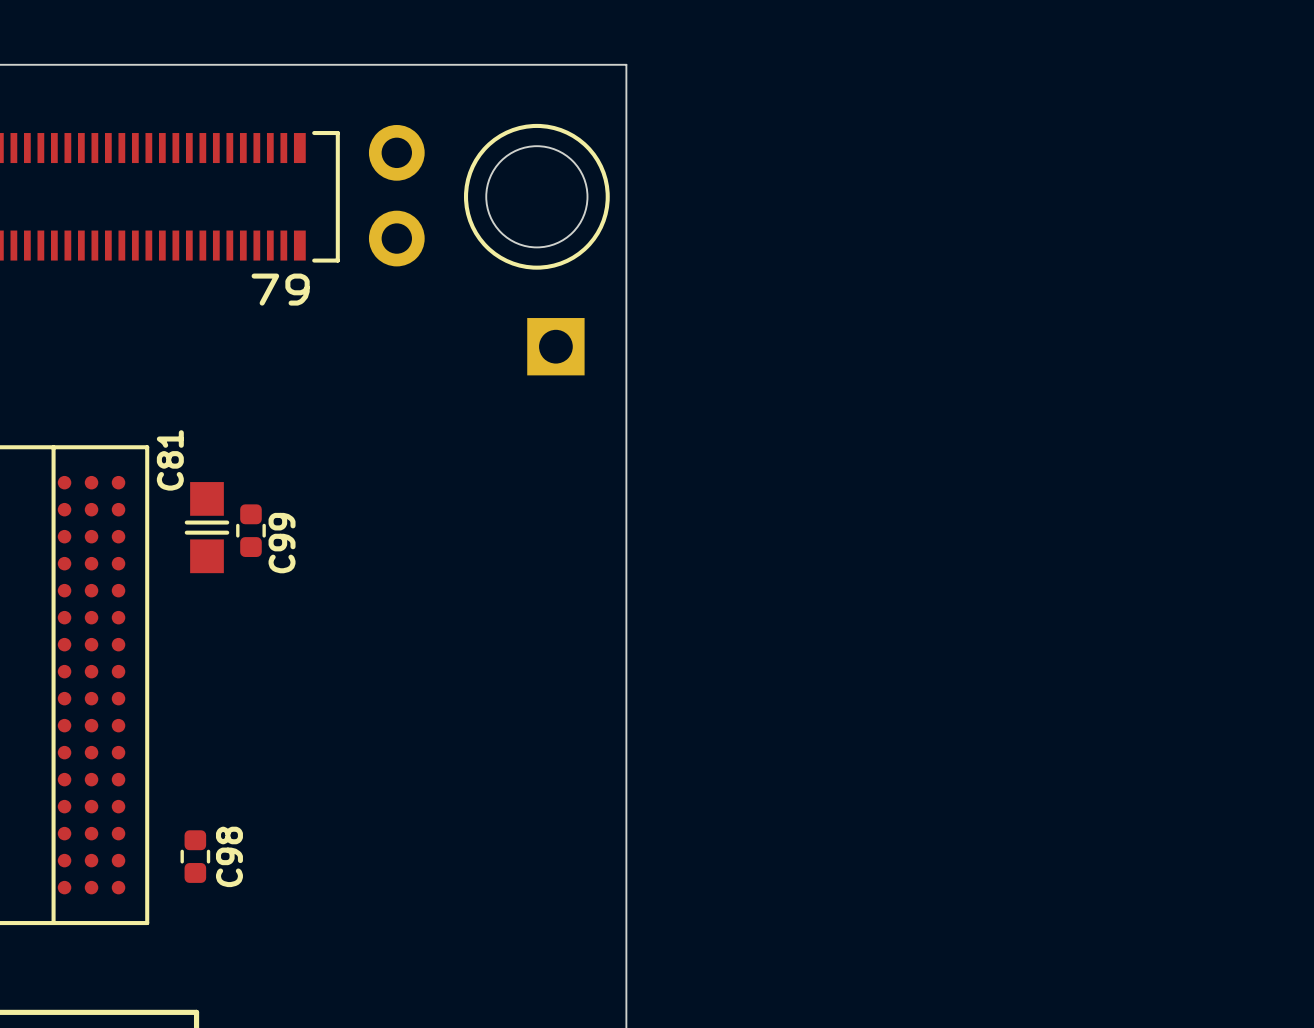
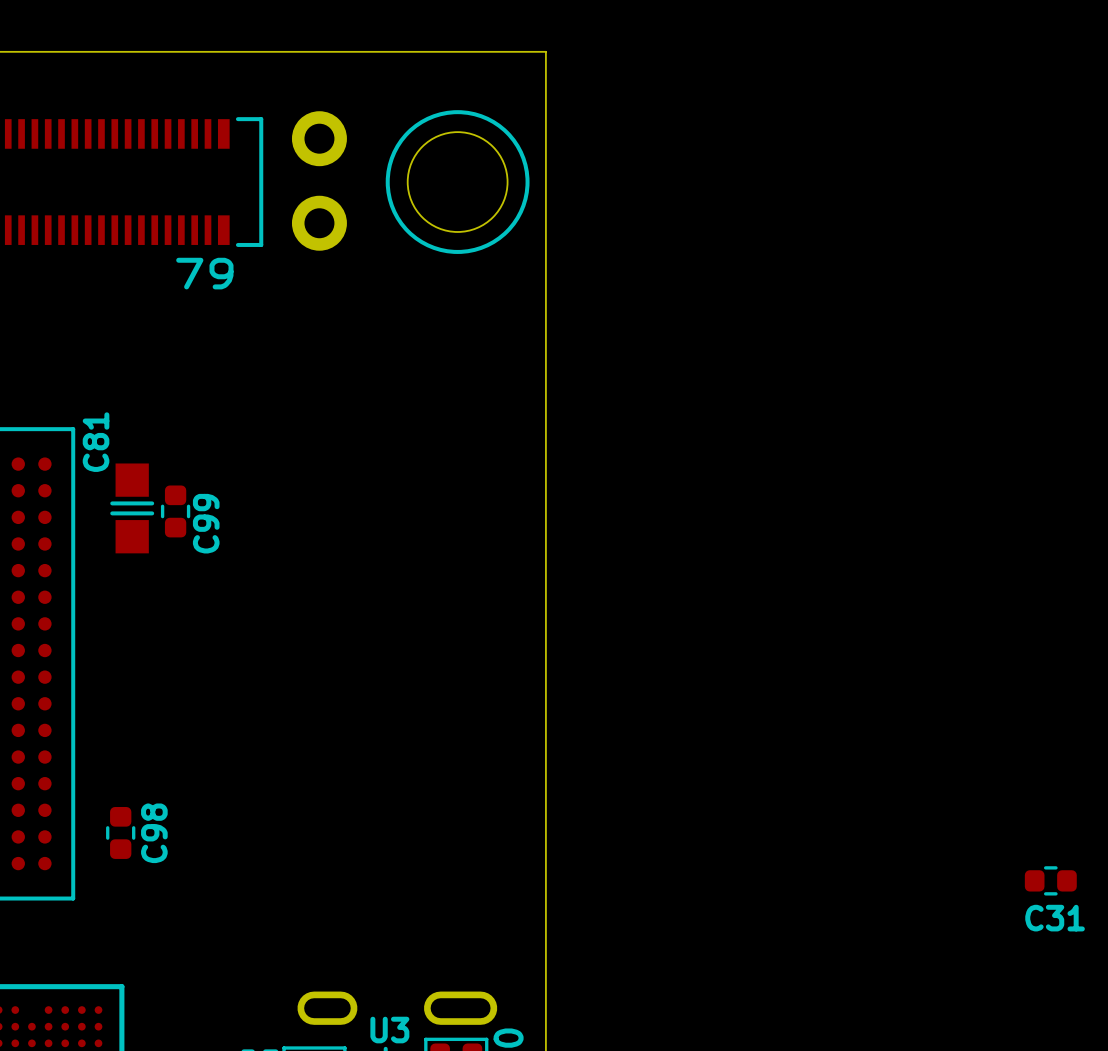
part: (555, 346) -> none
C31: none -> (1050, 880)

